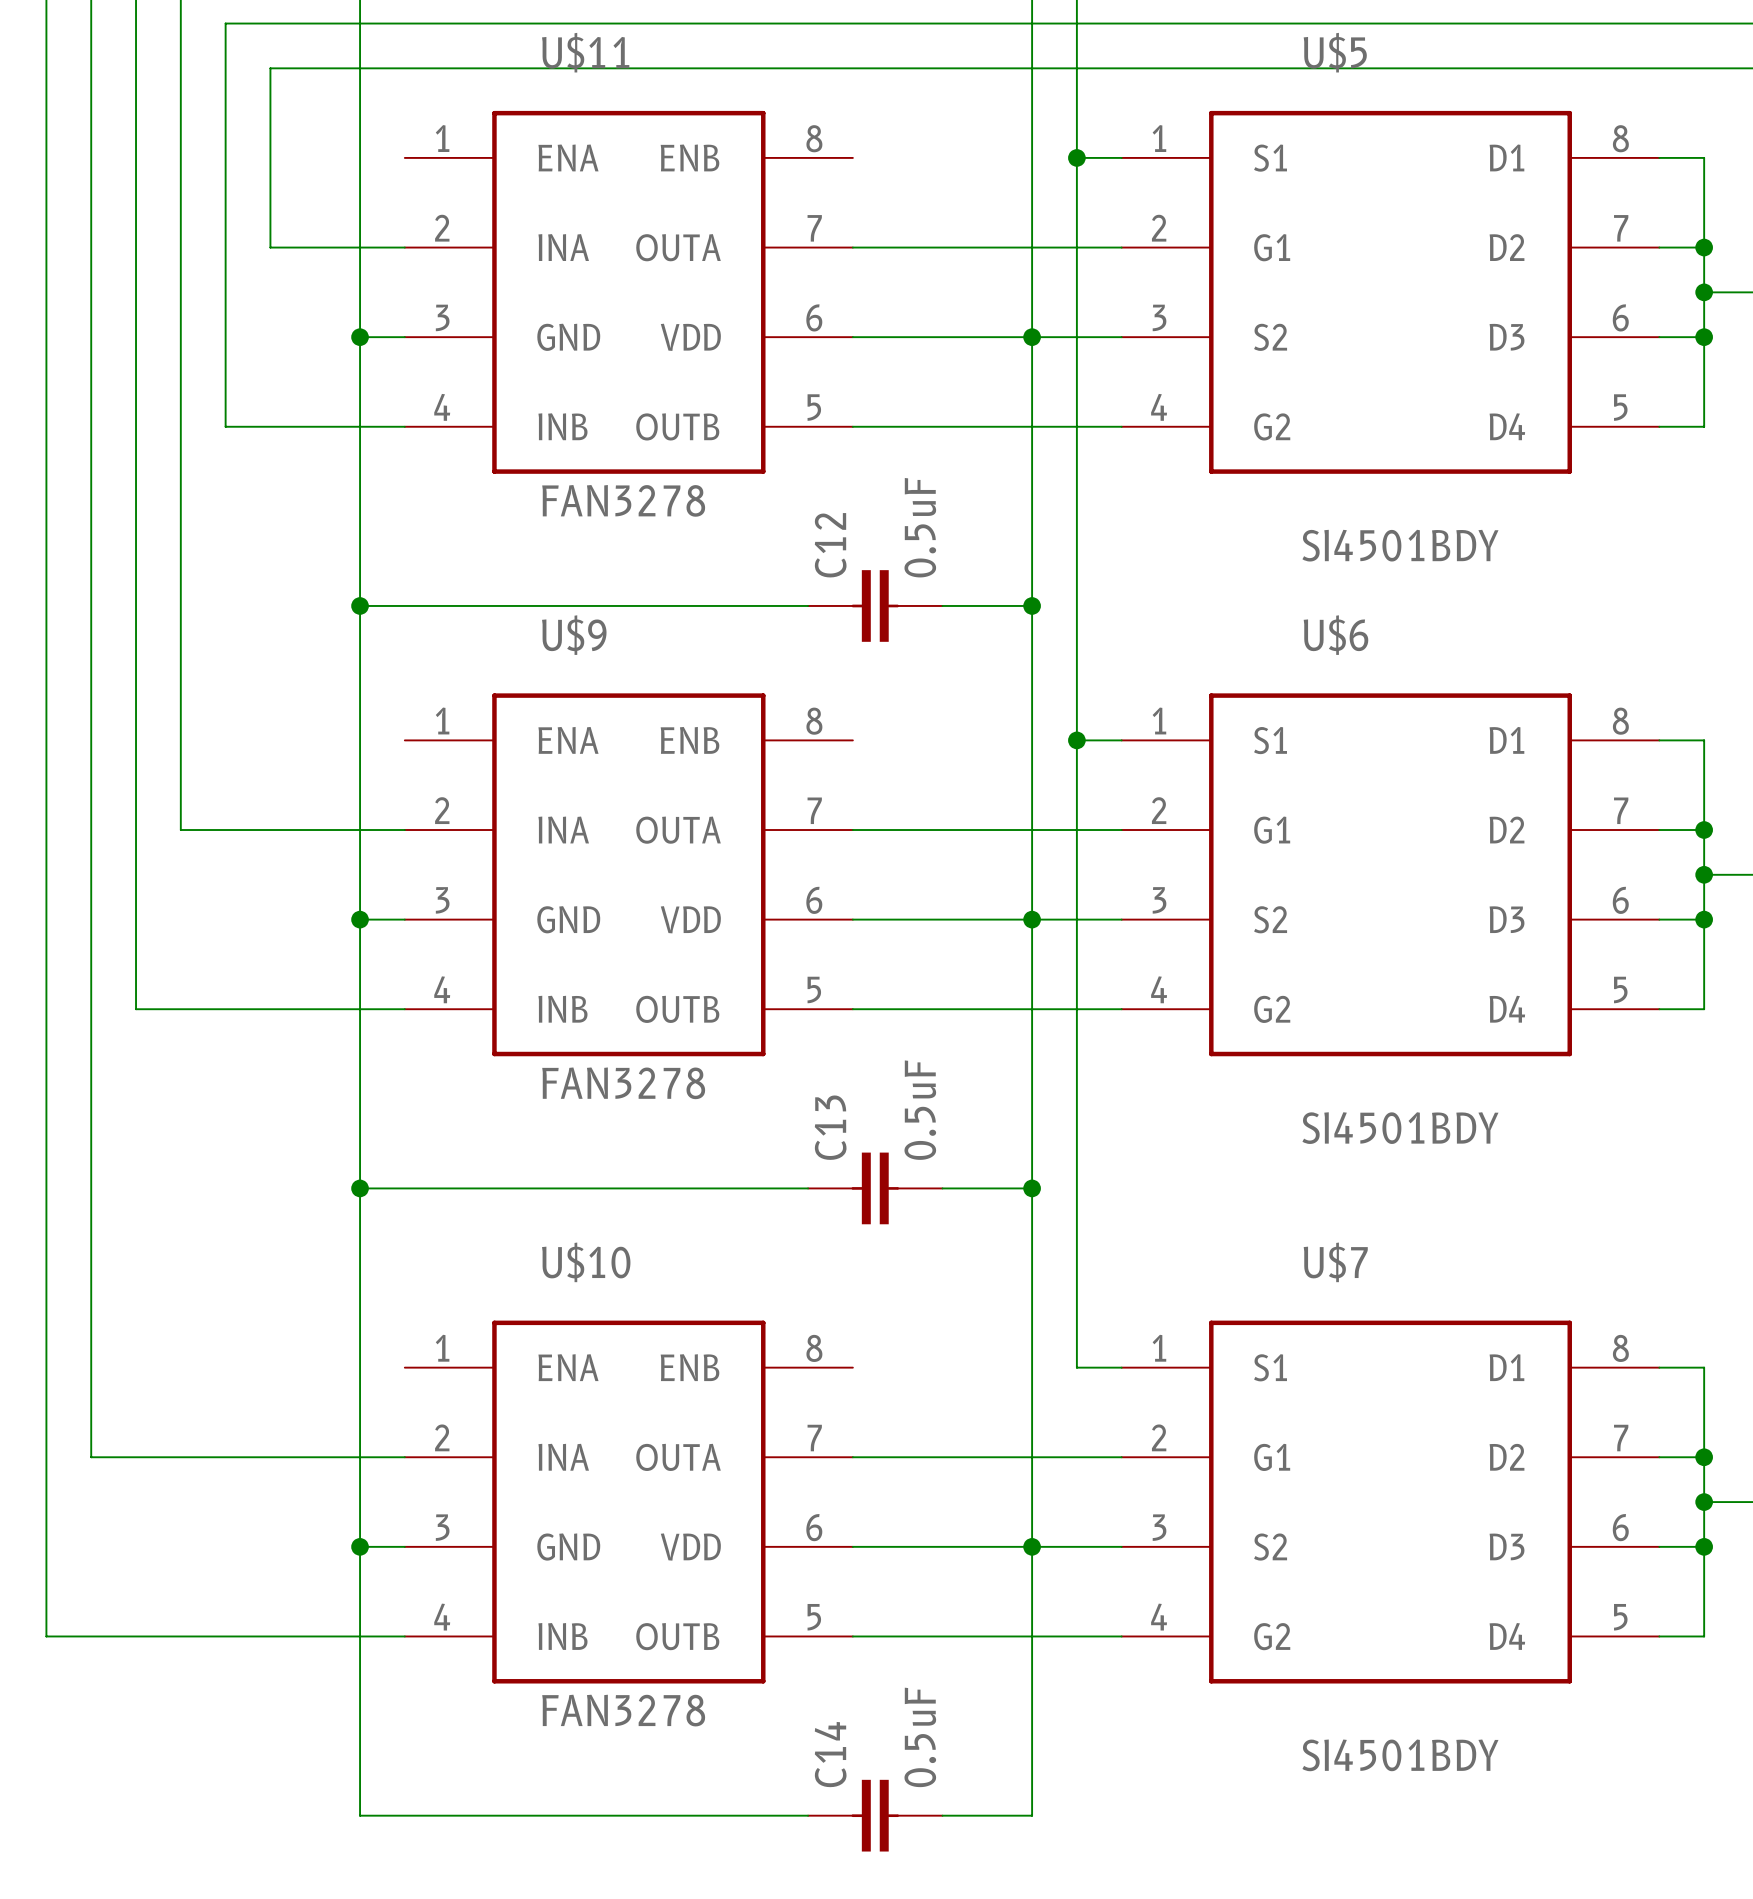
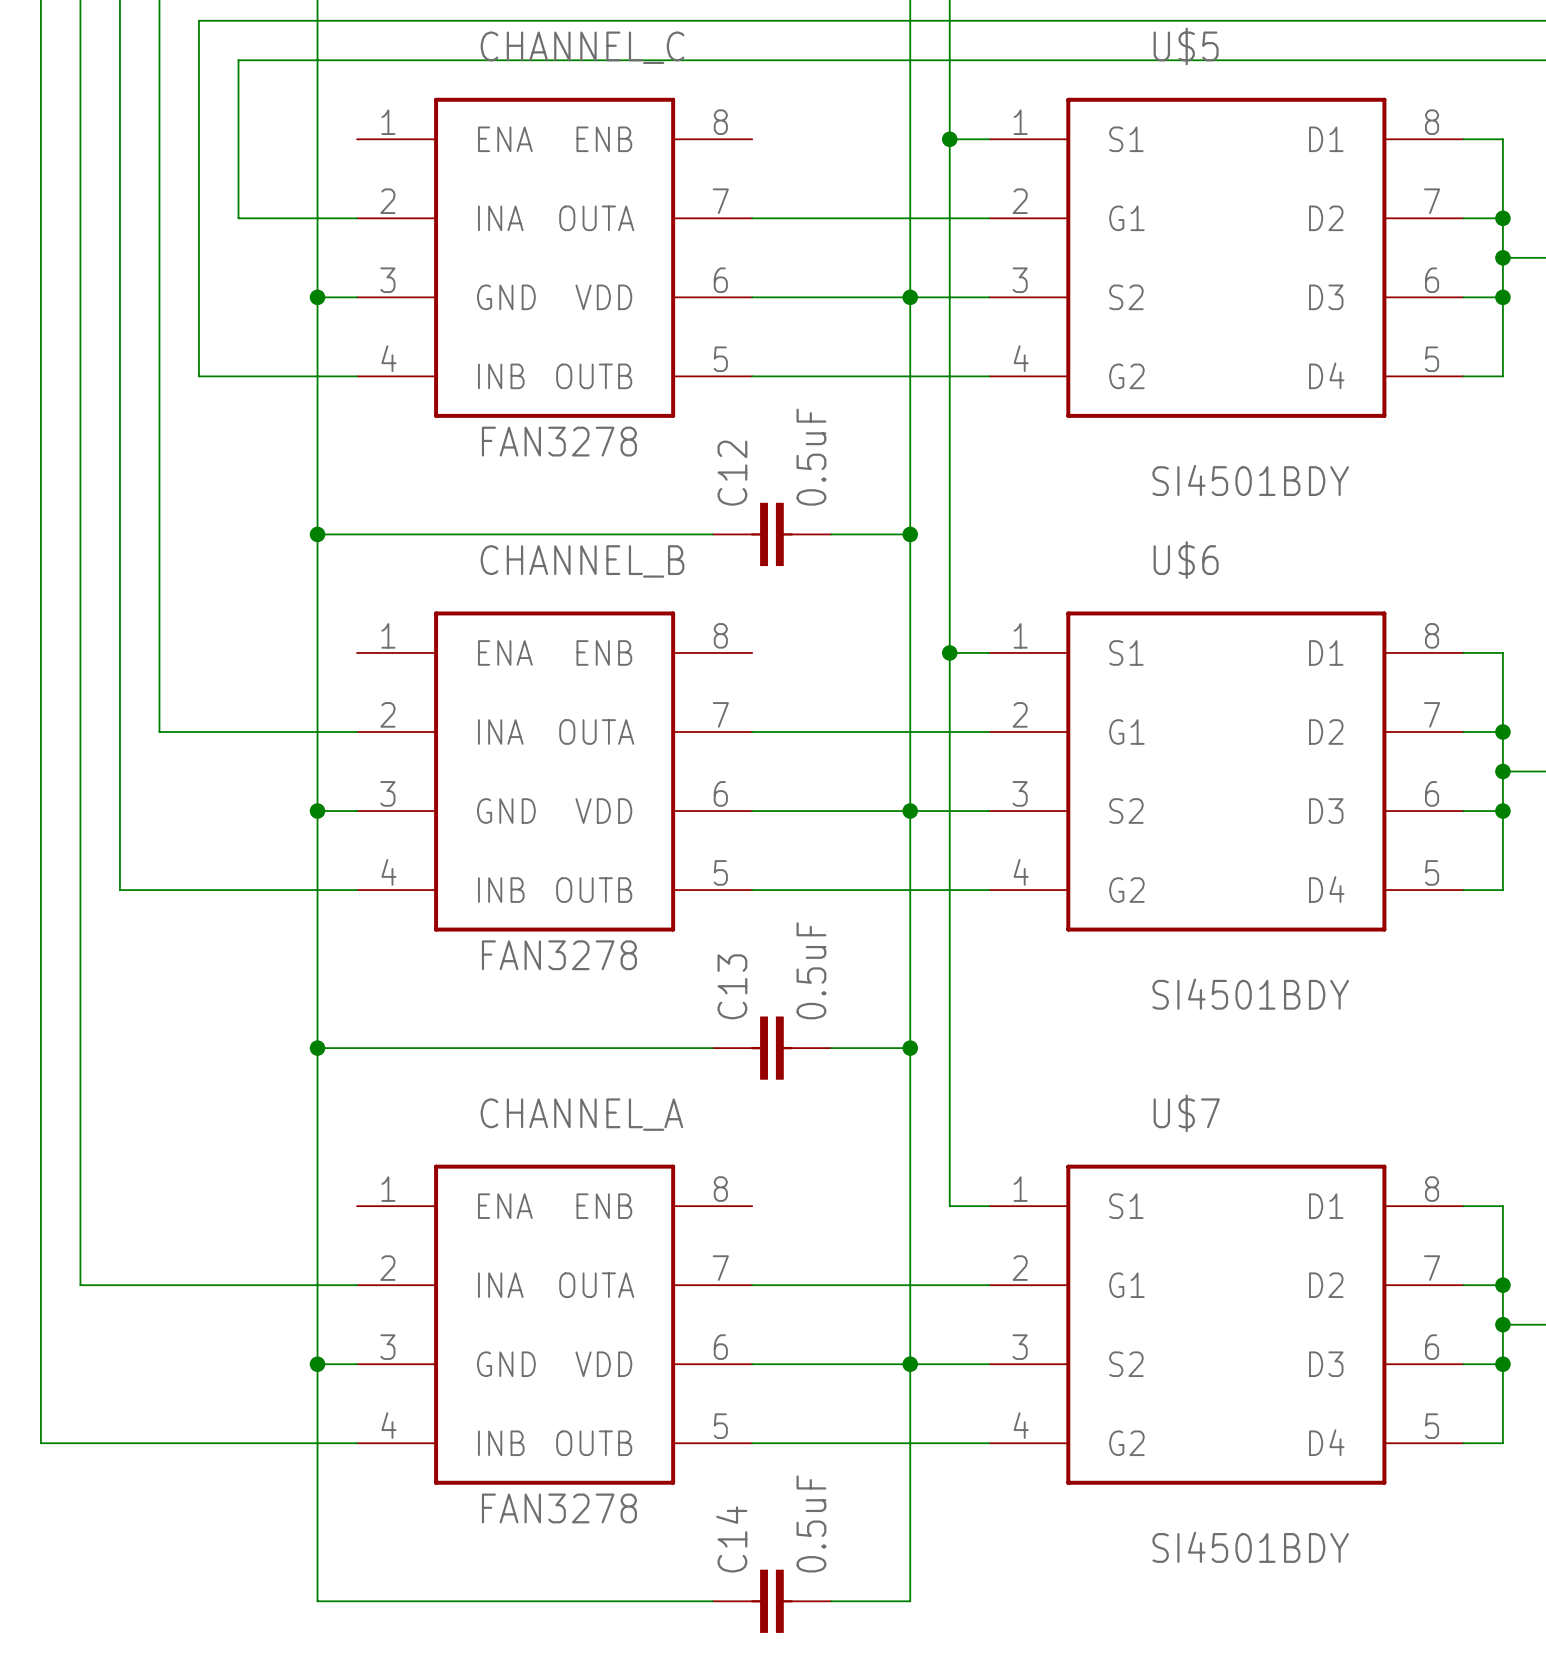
U$11 name: U$11 (585, 52) -> CHANNEL_C (582, 47)
U$9 name: U$9 (574, 635) -> CHANNEL_B (582, 561)
U$10 name: U$10 (586, 1262) -> CHANNEL_A (581, 1114)

